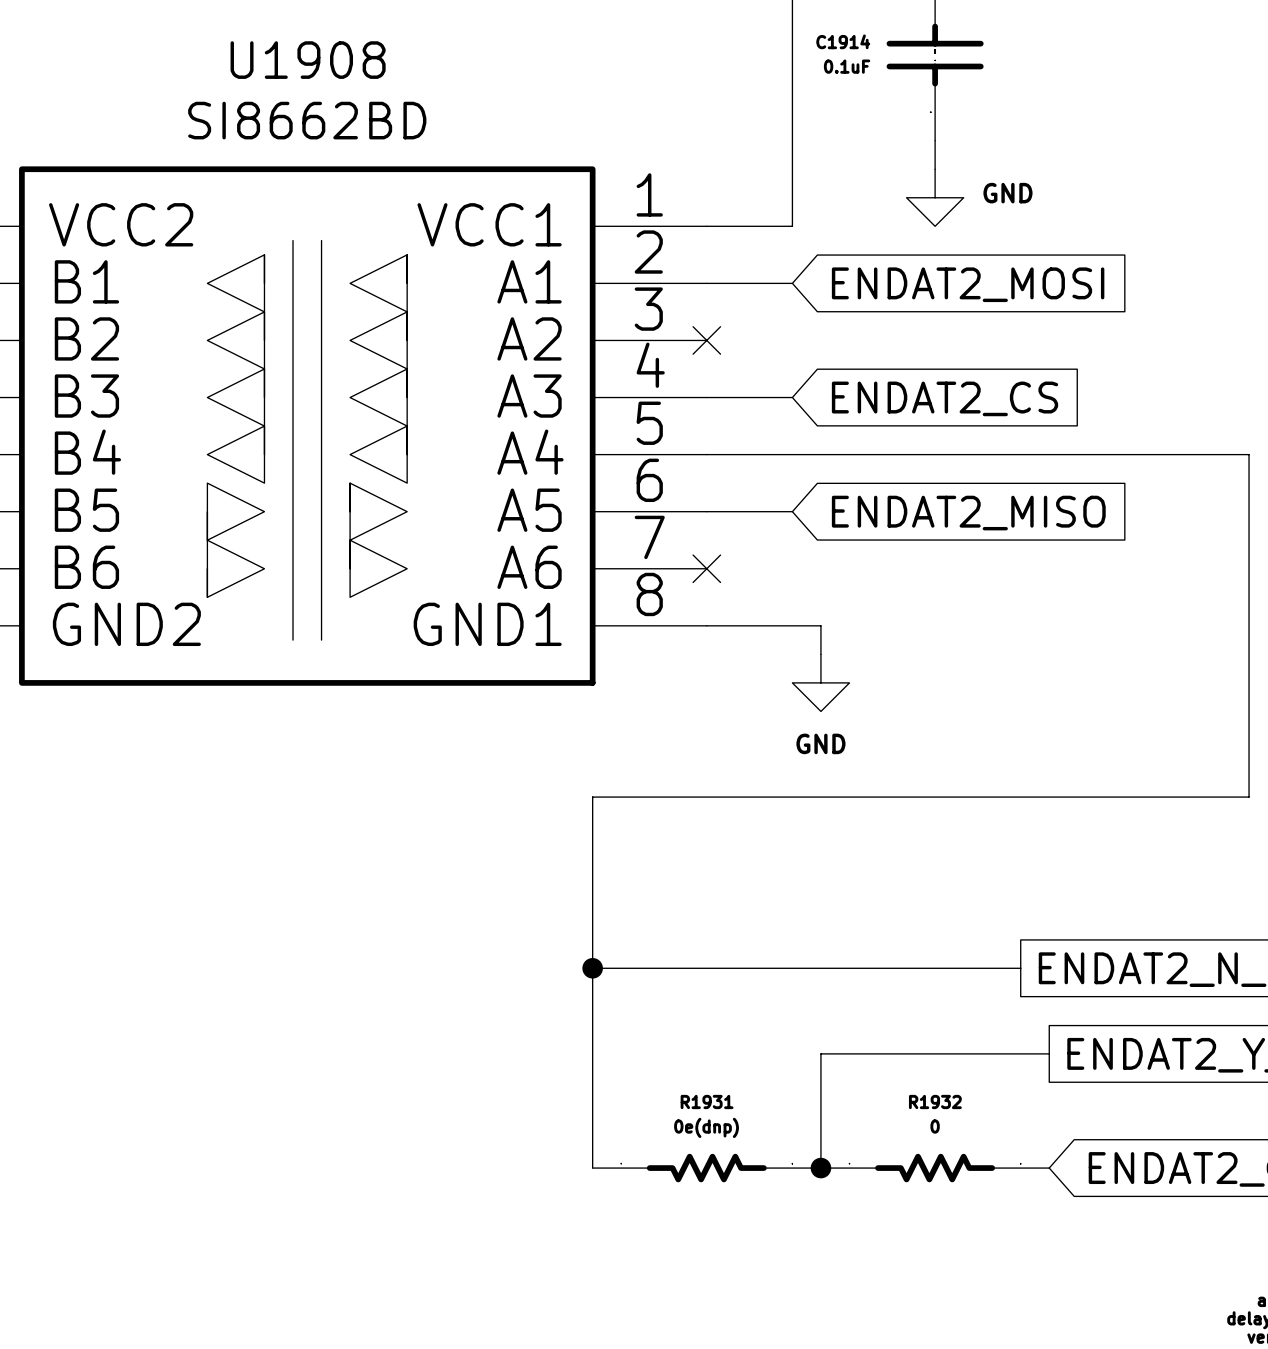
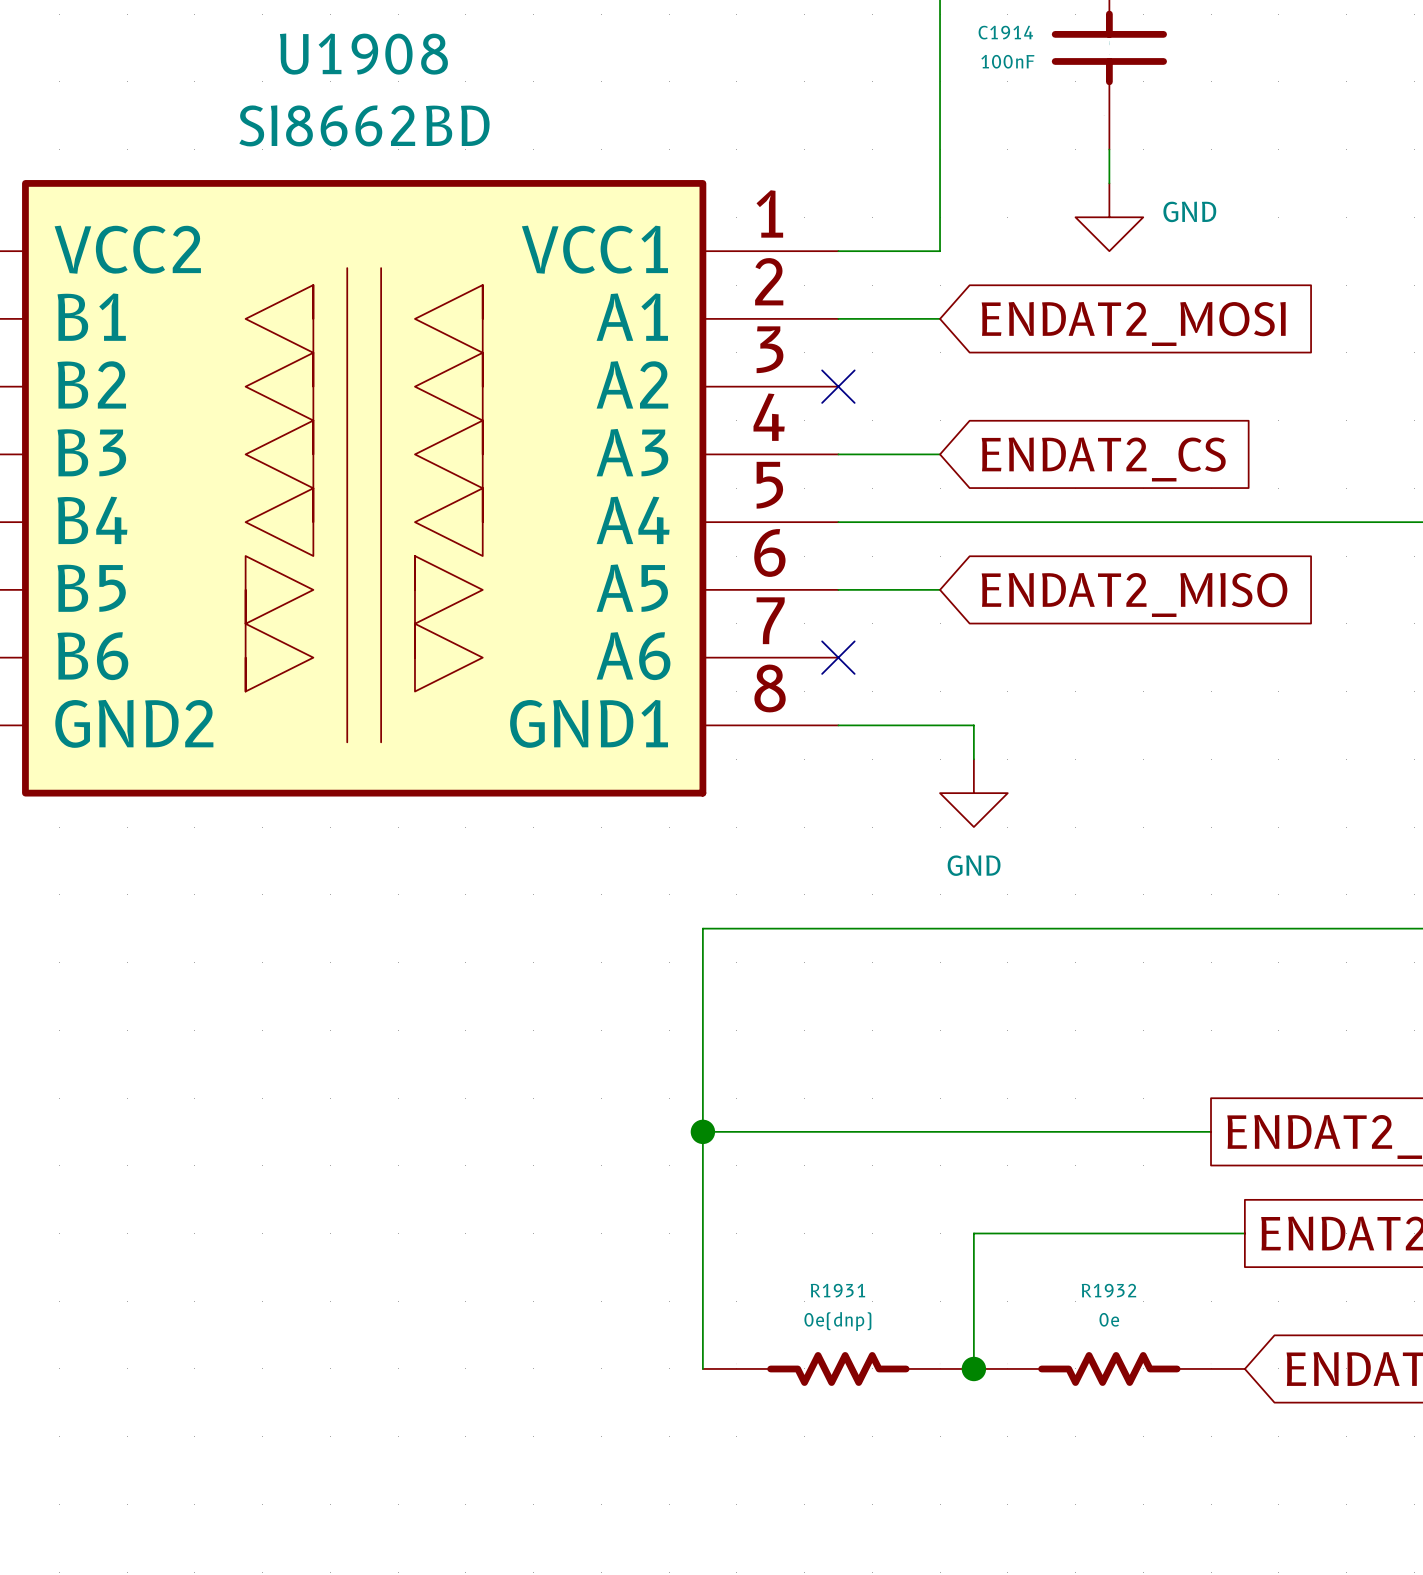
C1914 value: 0.1uF (847, 66) -> 100nF (1007, 61)
R1932 value: 0 (935, 1126) -> 0e (1109, 1319)

